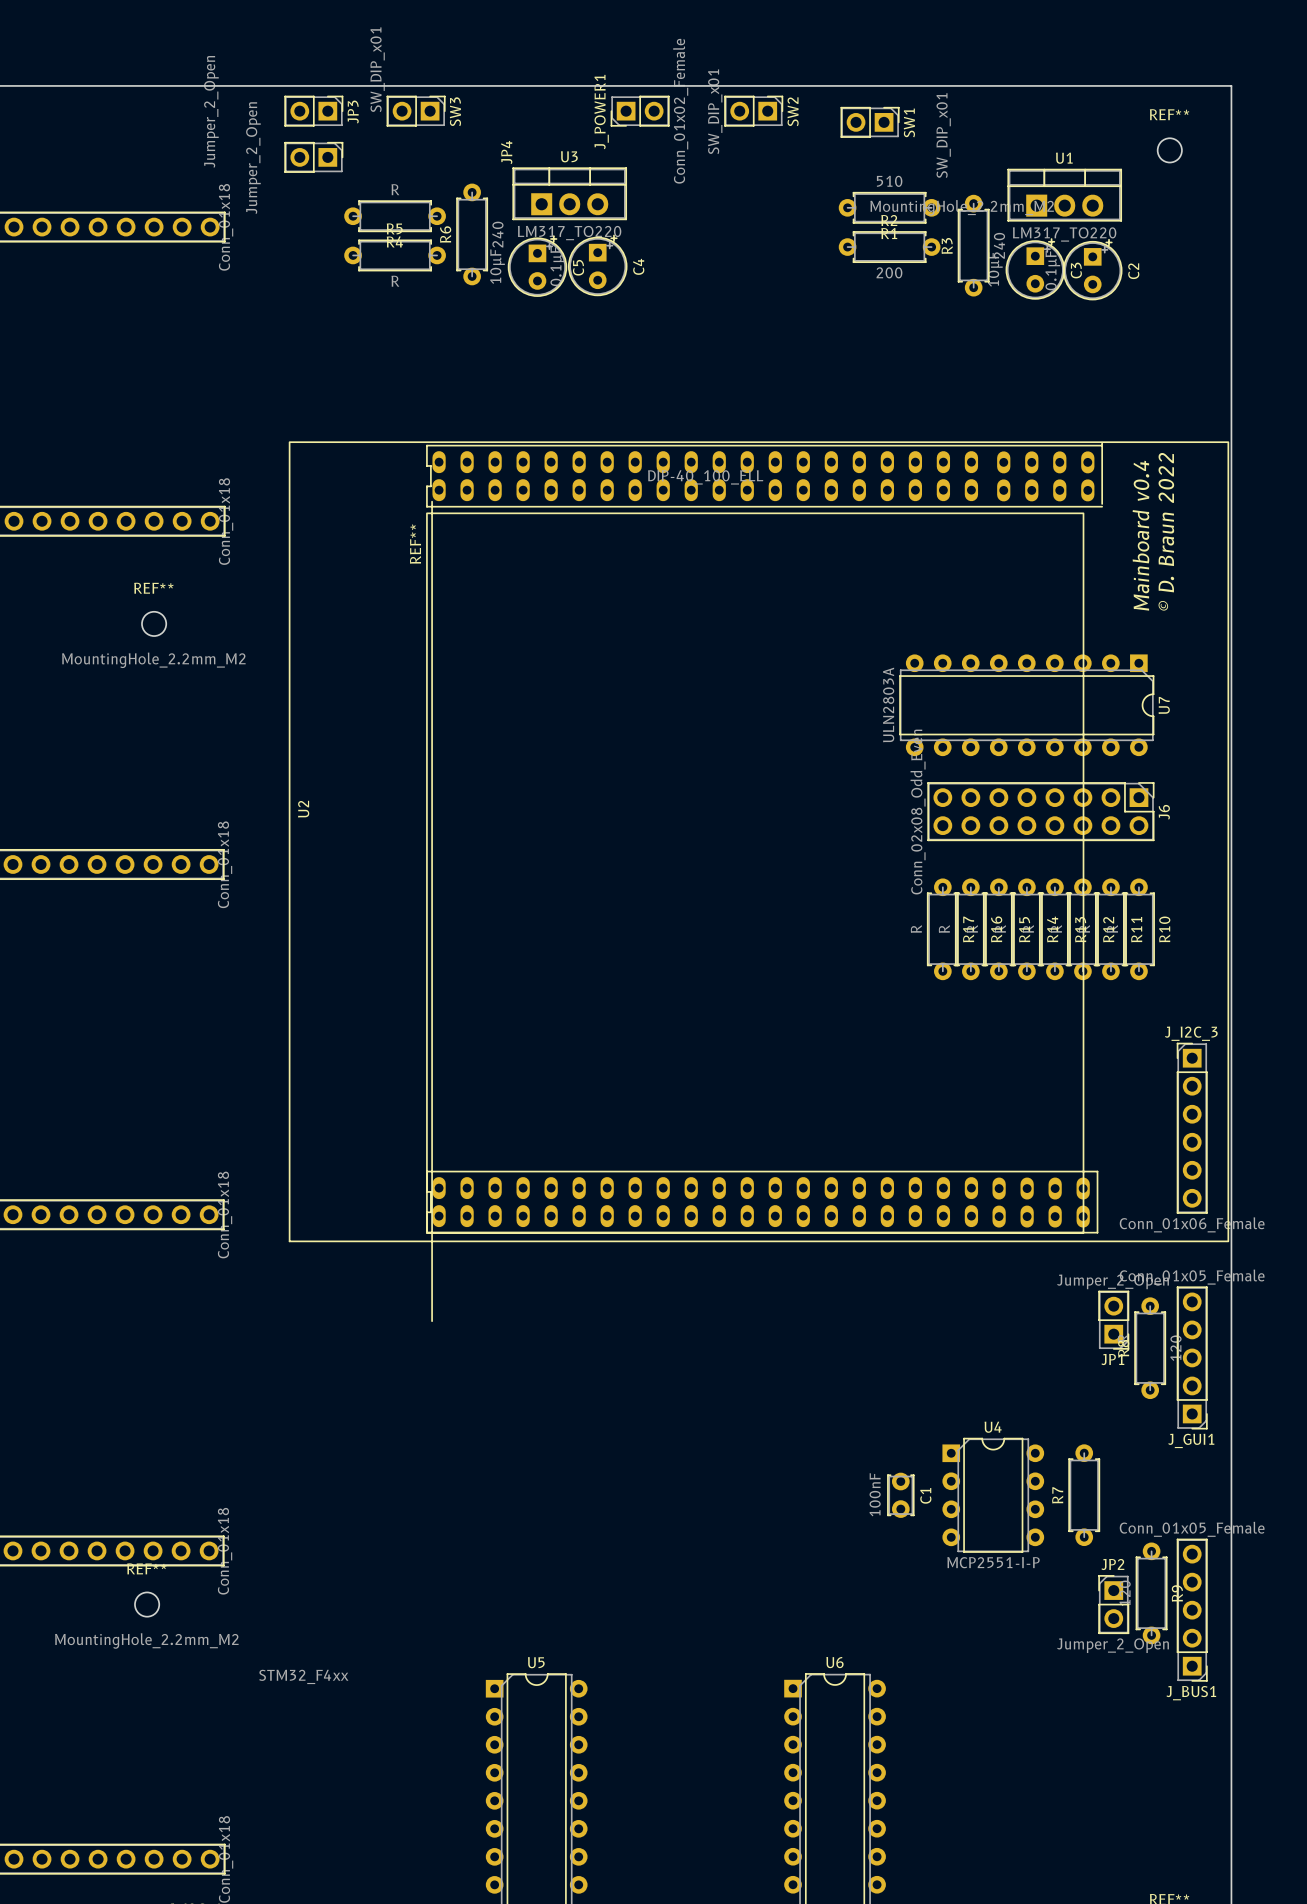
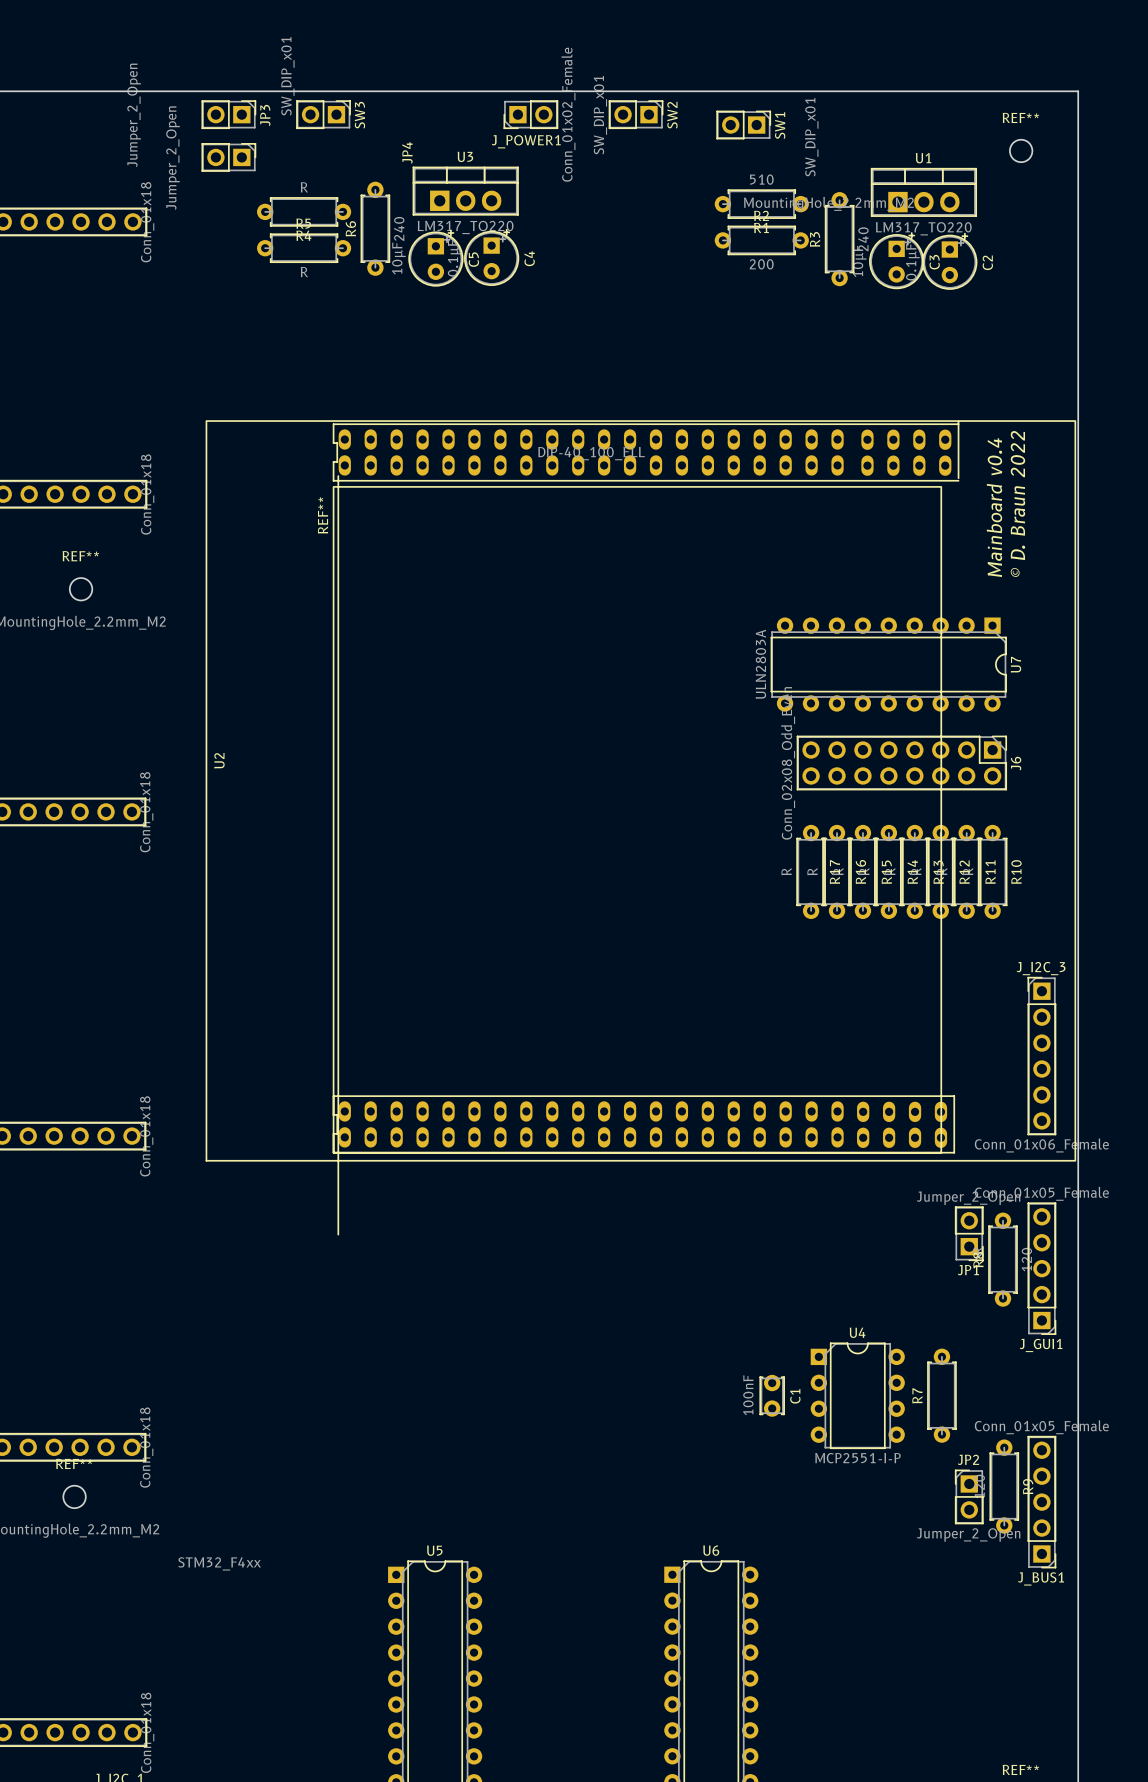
J_POWER1 name rotation: 0° (601, 112) -> 90° clockwise (526, 141)

